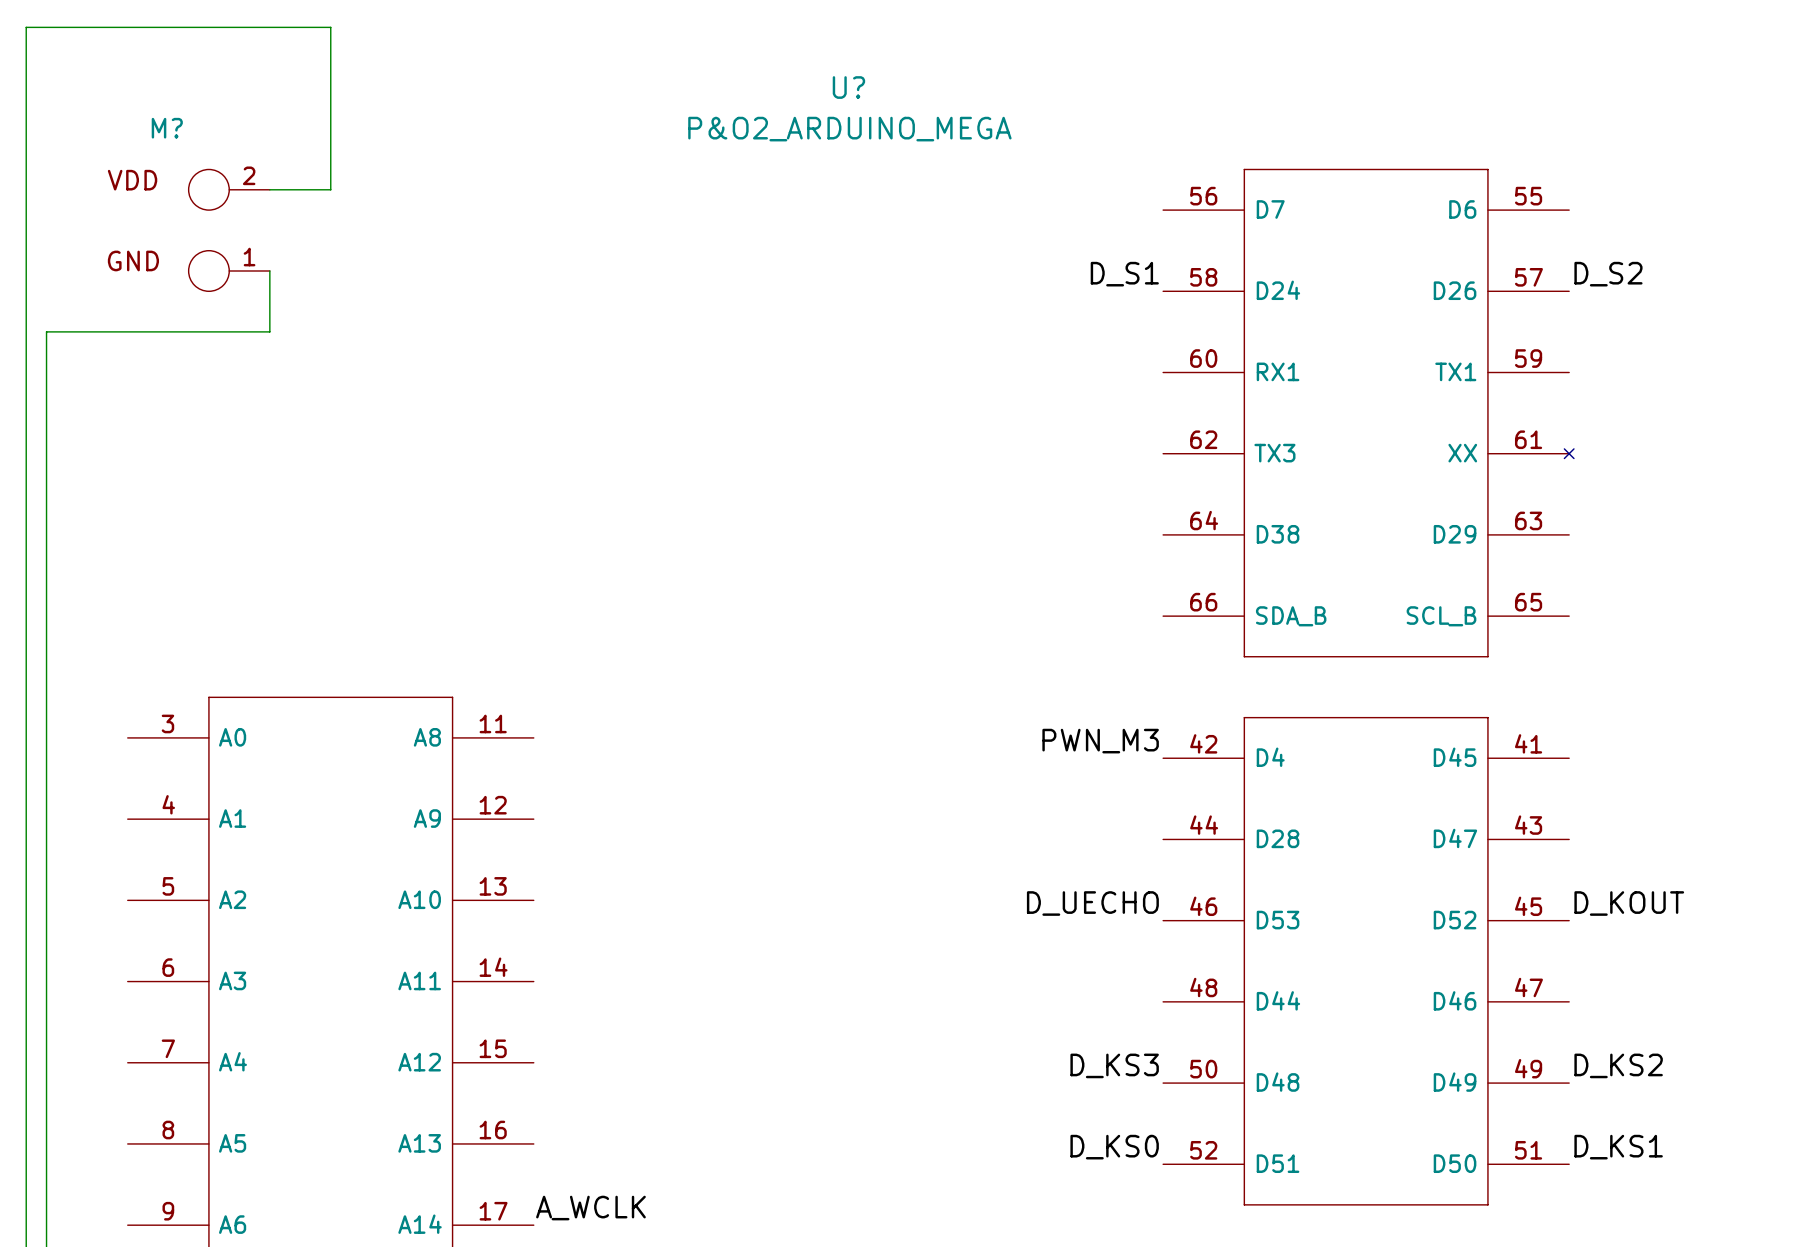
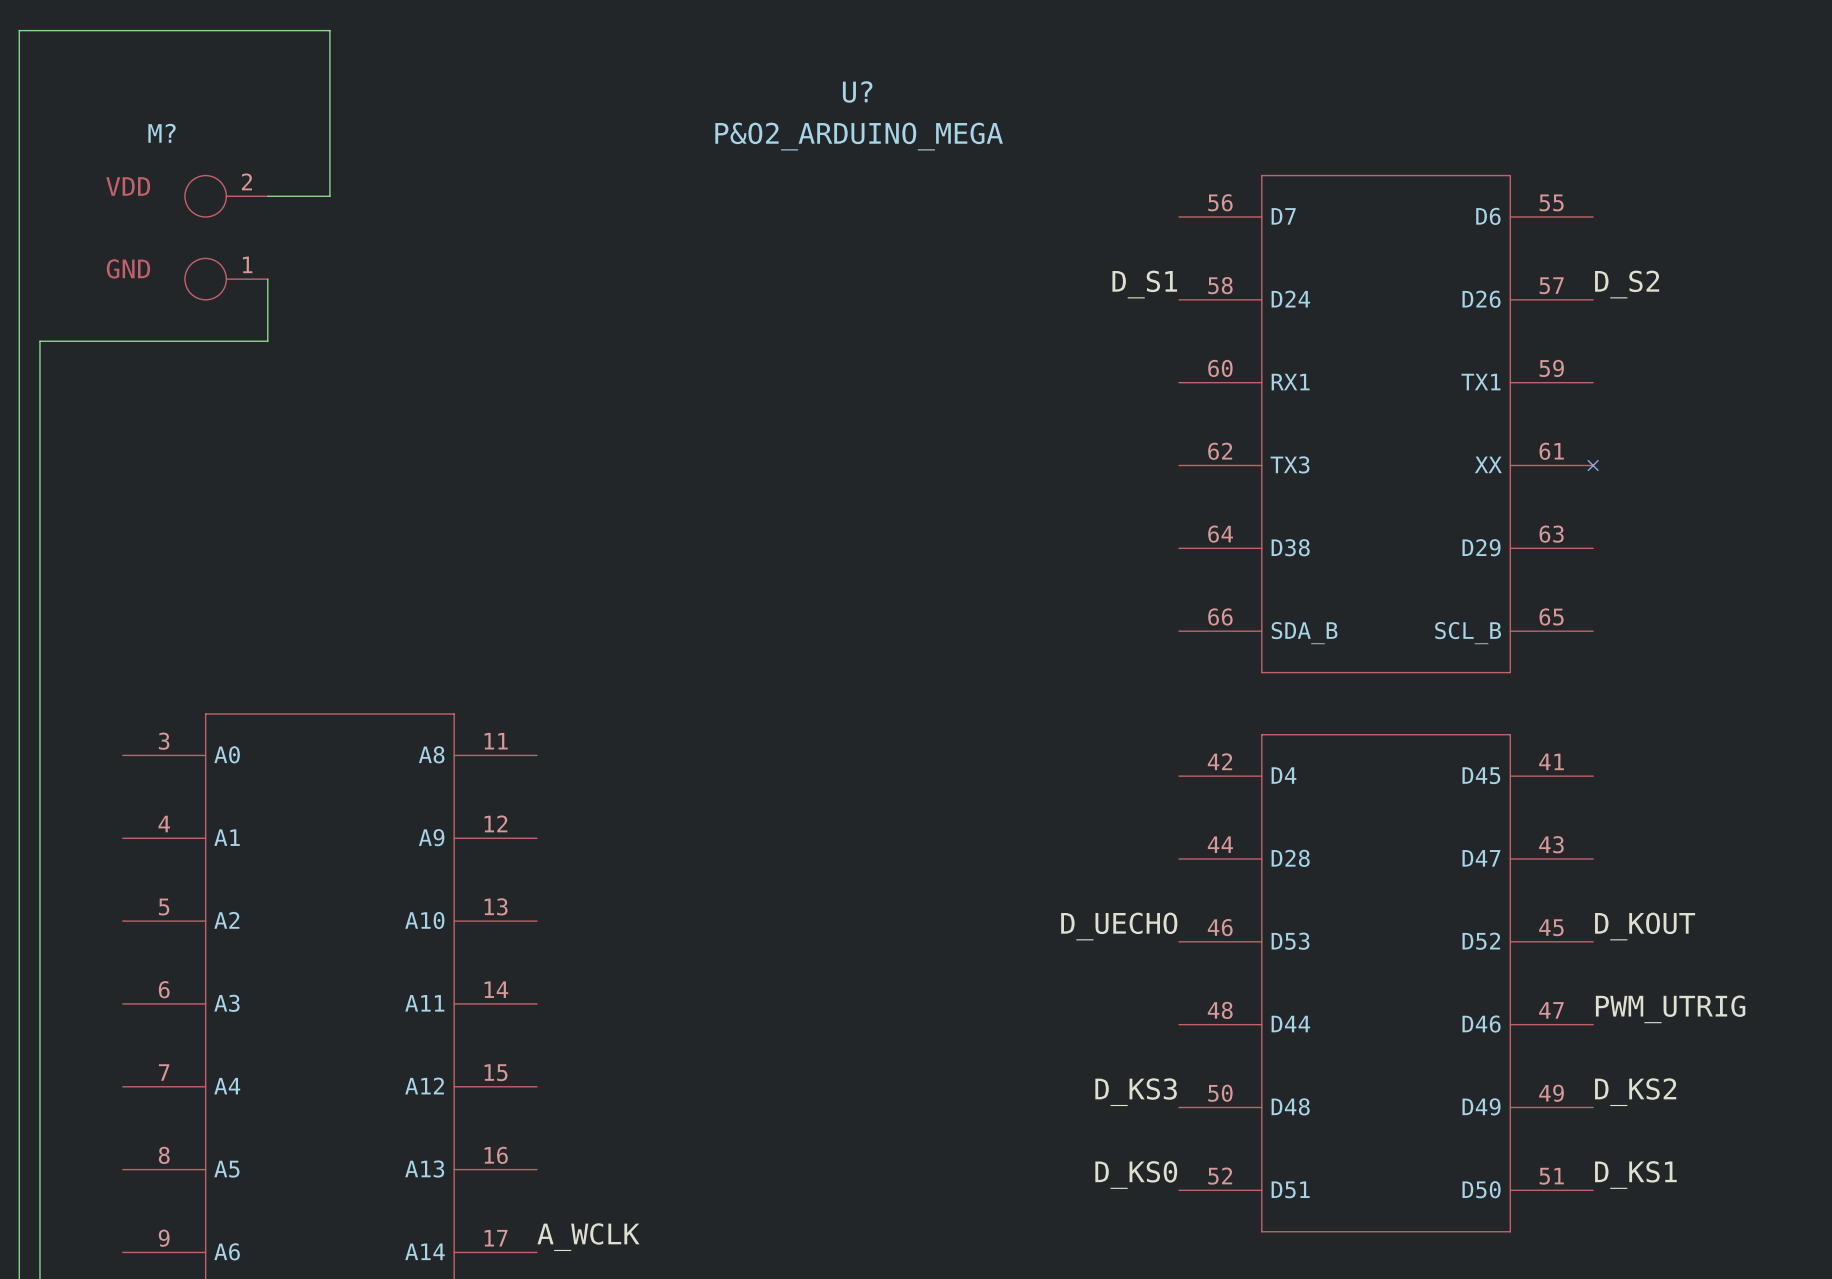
label: PWN_M3 (1100, 741) -> none
label: none -> PWM_UTRIG (1670, 1009)

